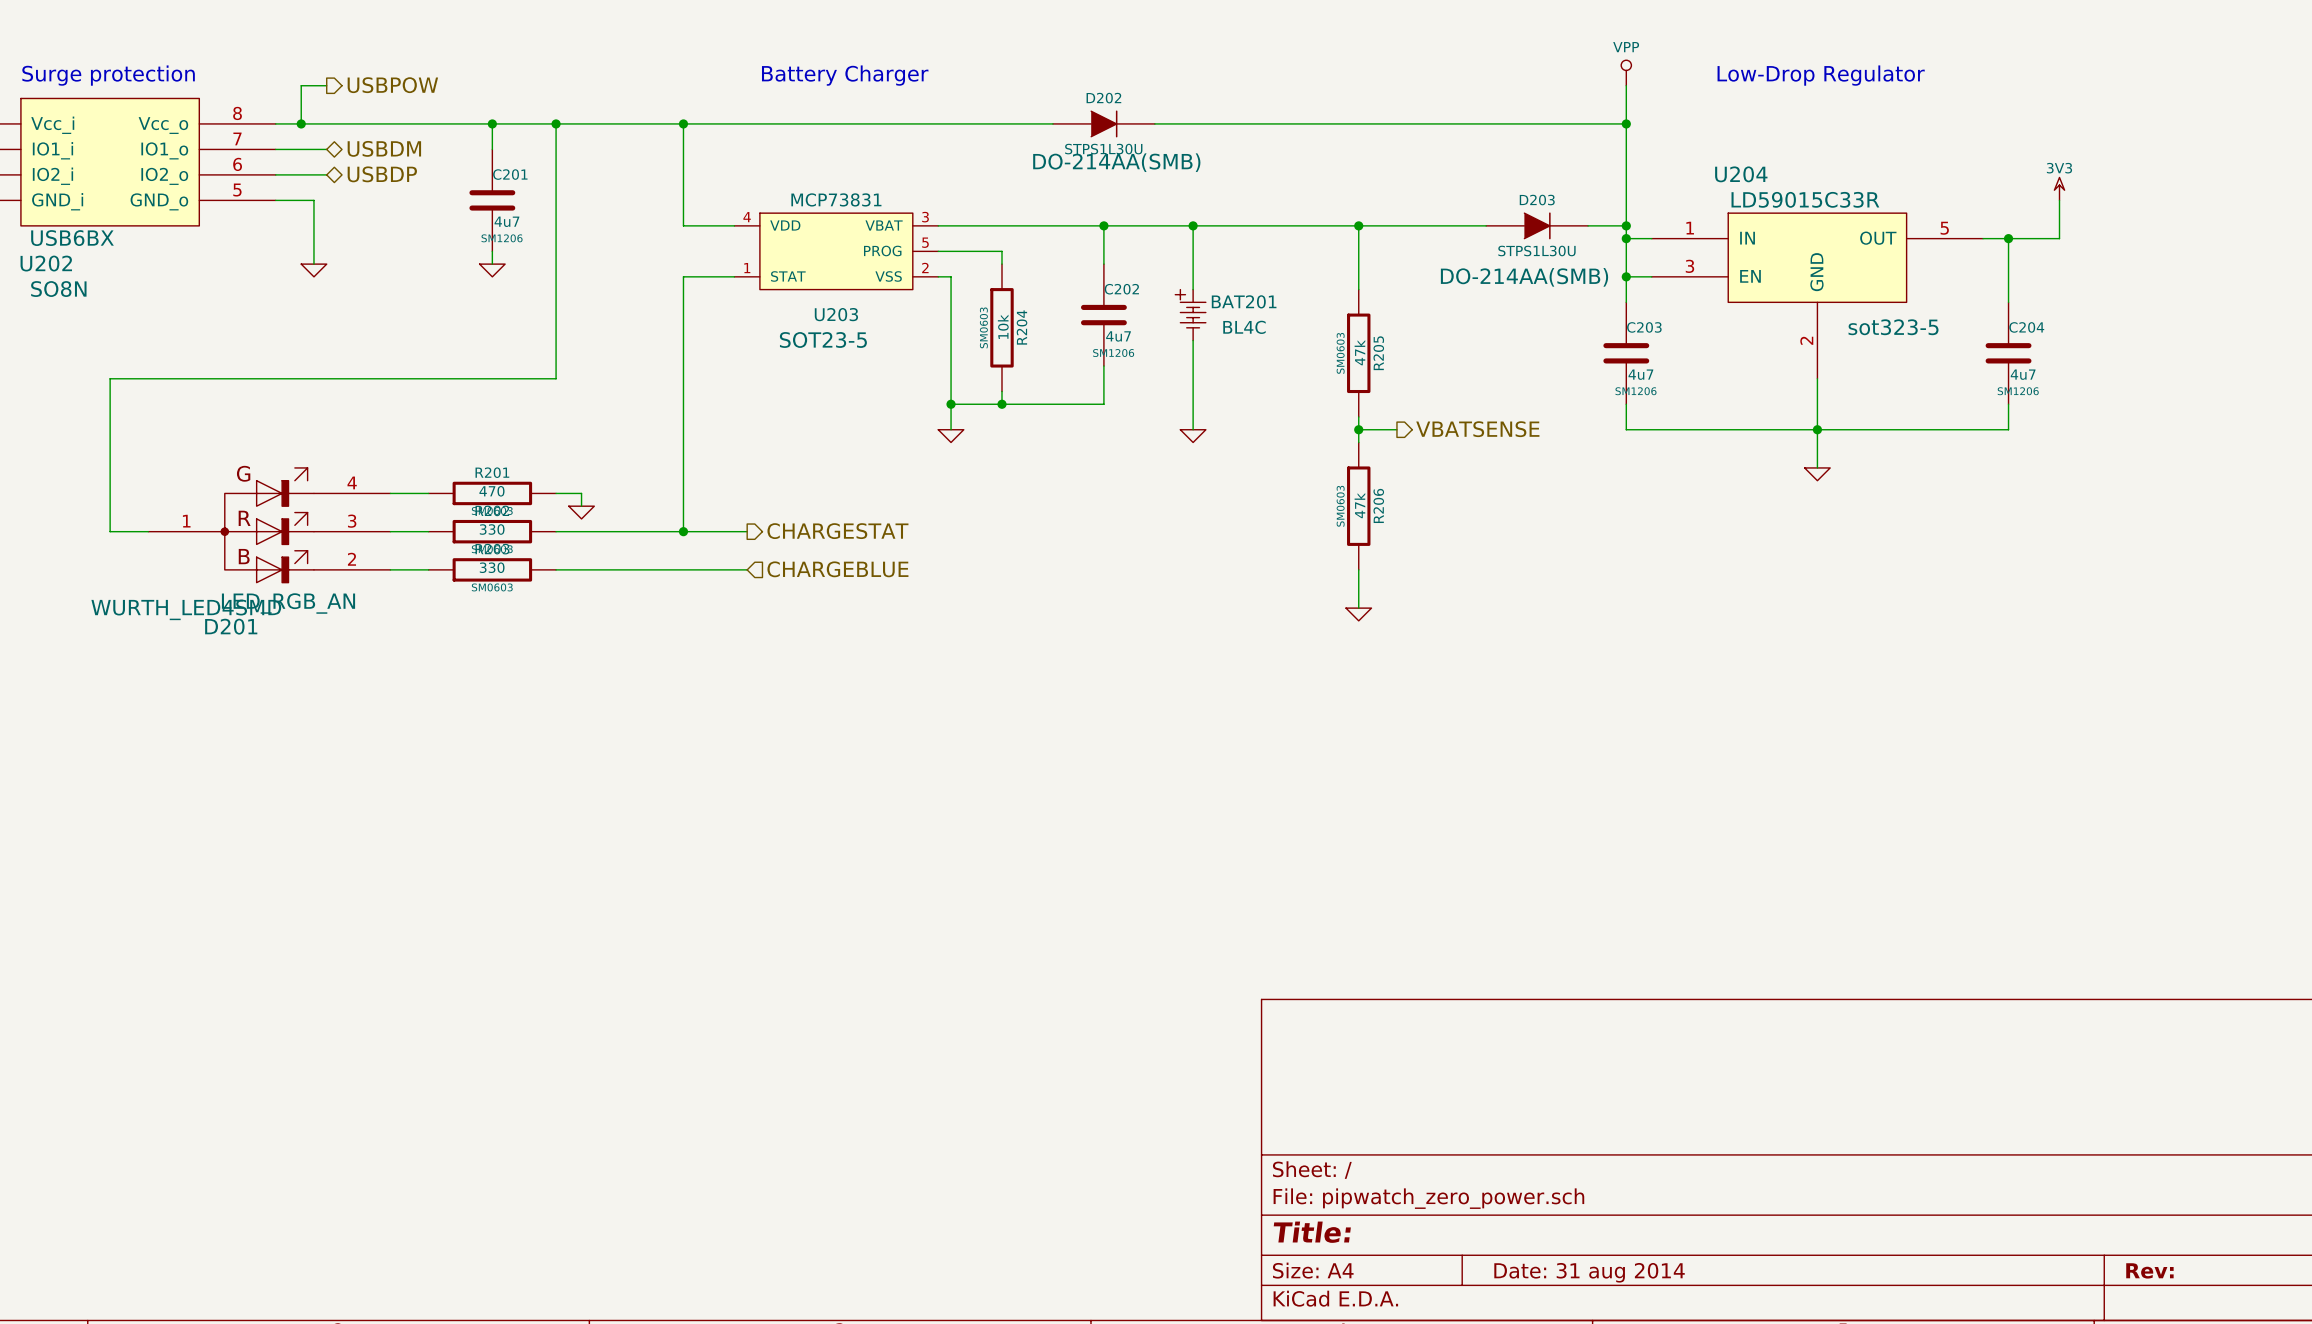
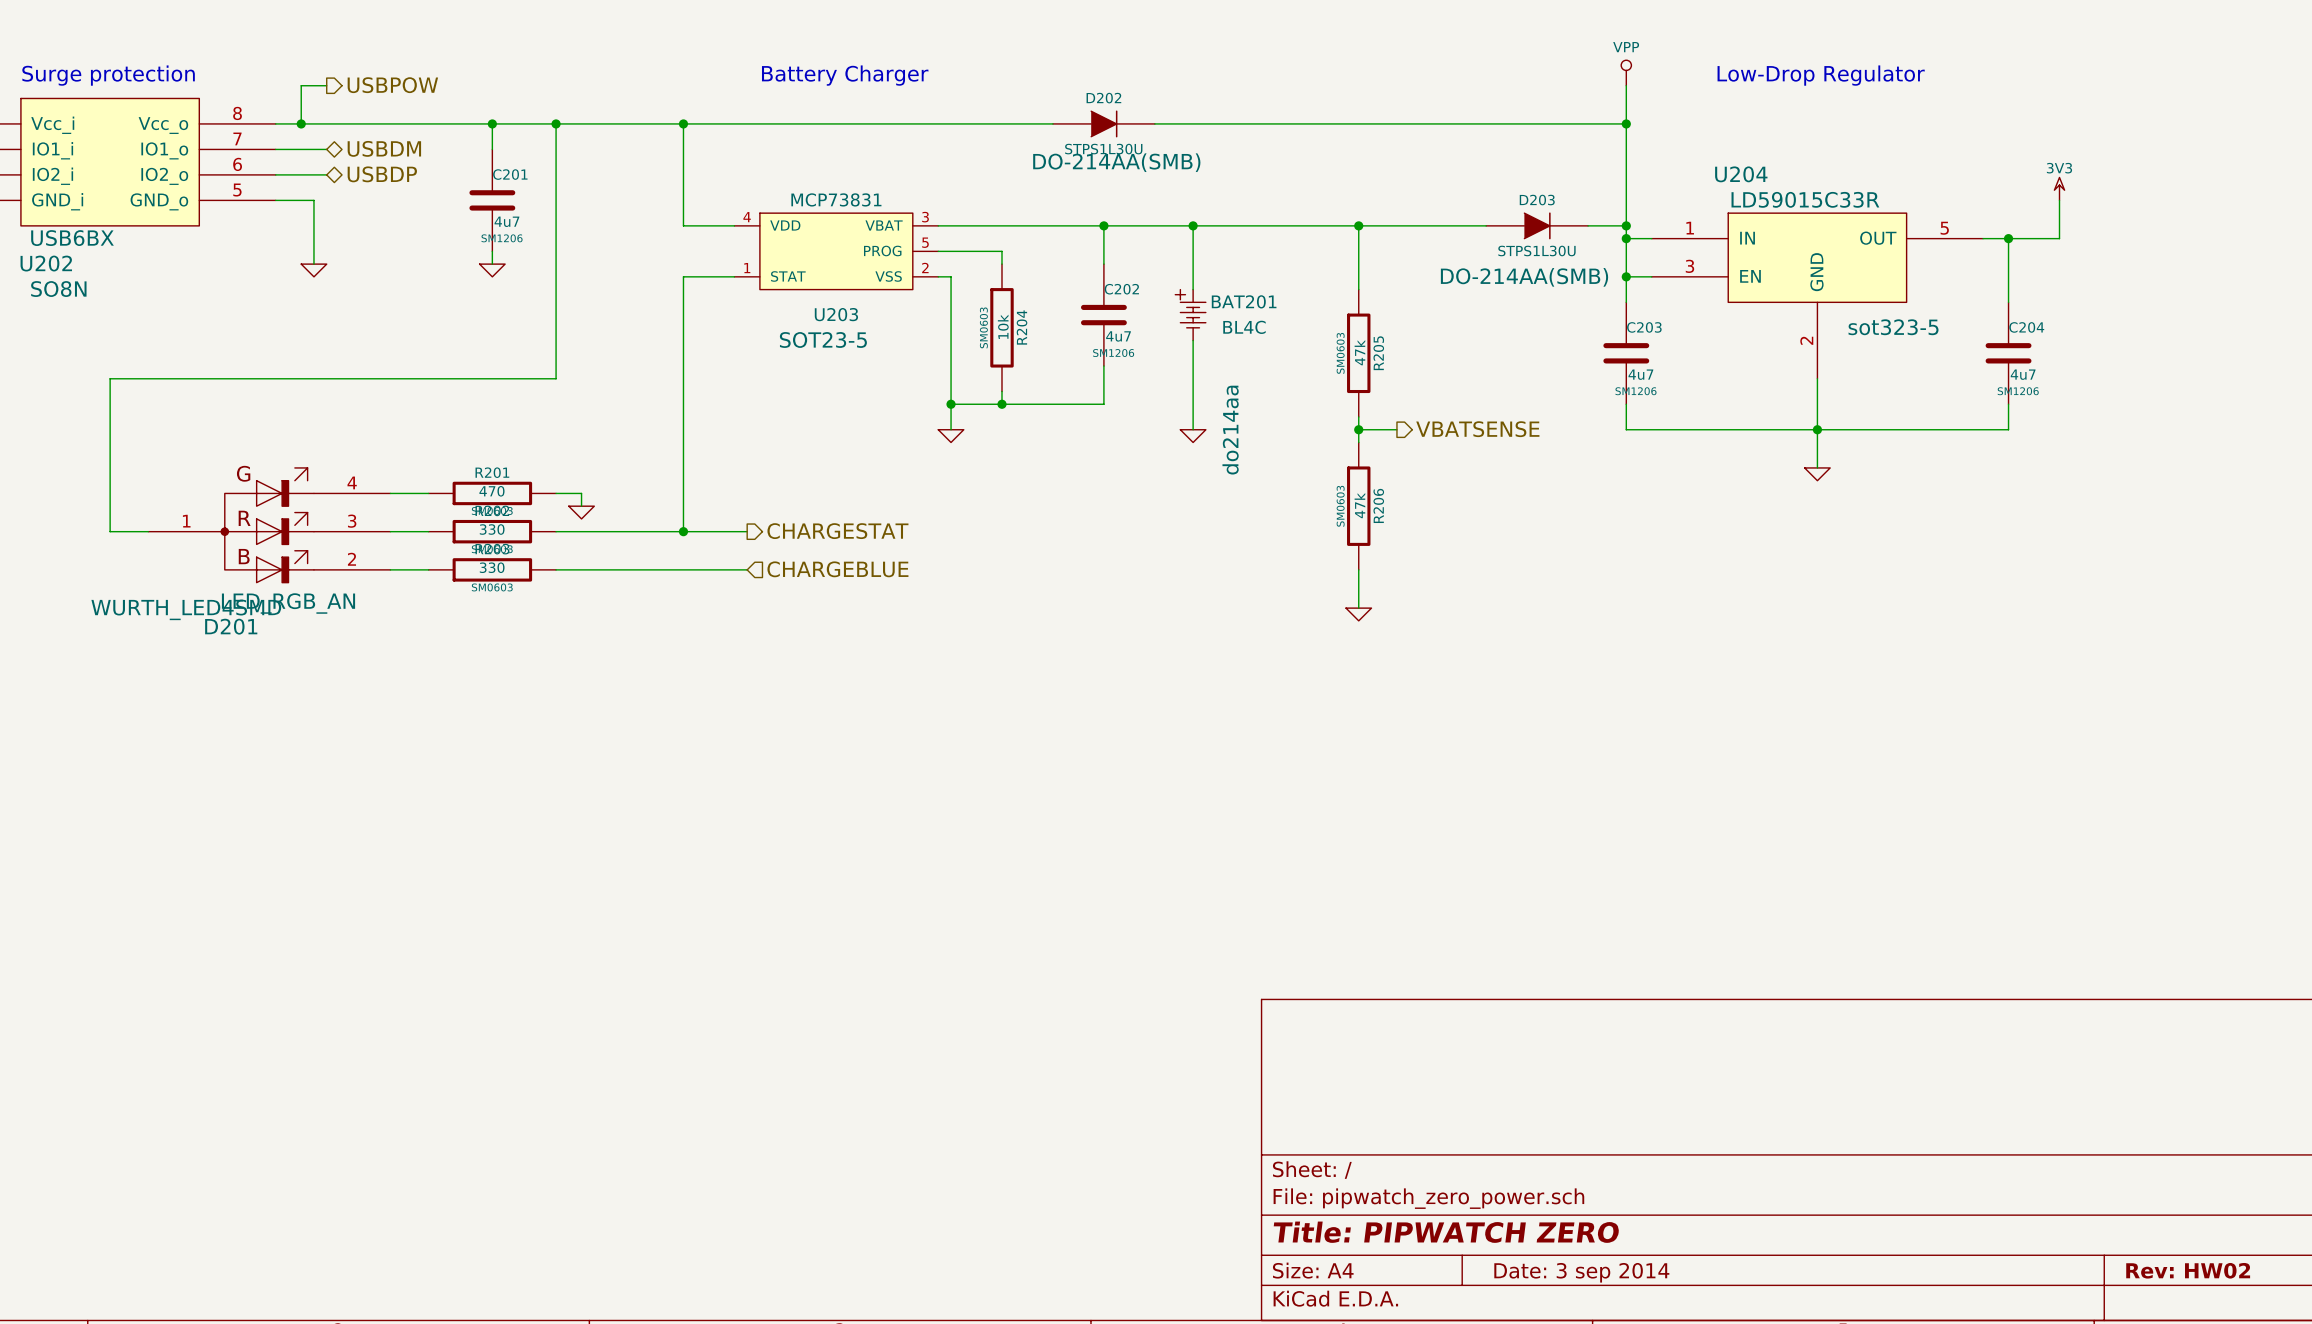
BAT201 text: none -> do214aa (1230, 430)
title block: Title: (1312, 1232) -> Title: PIPWATCH ZERO (1446, 1232)
title block: Rev: (2149, 1270) -> Rev: HW02 (2188, 1270)
title block: Date: 31 aug 2014 (1589, 1272) -> Date: 3 sep 2014 (1581, 1272)

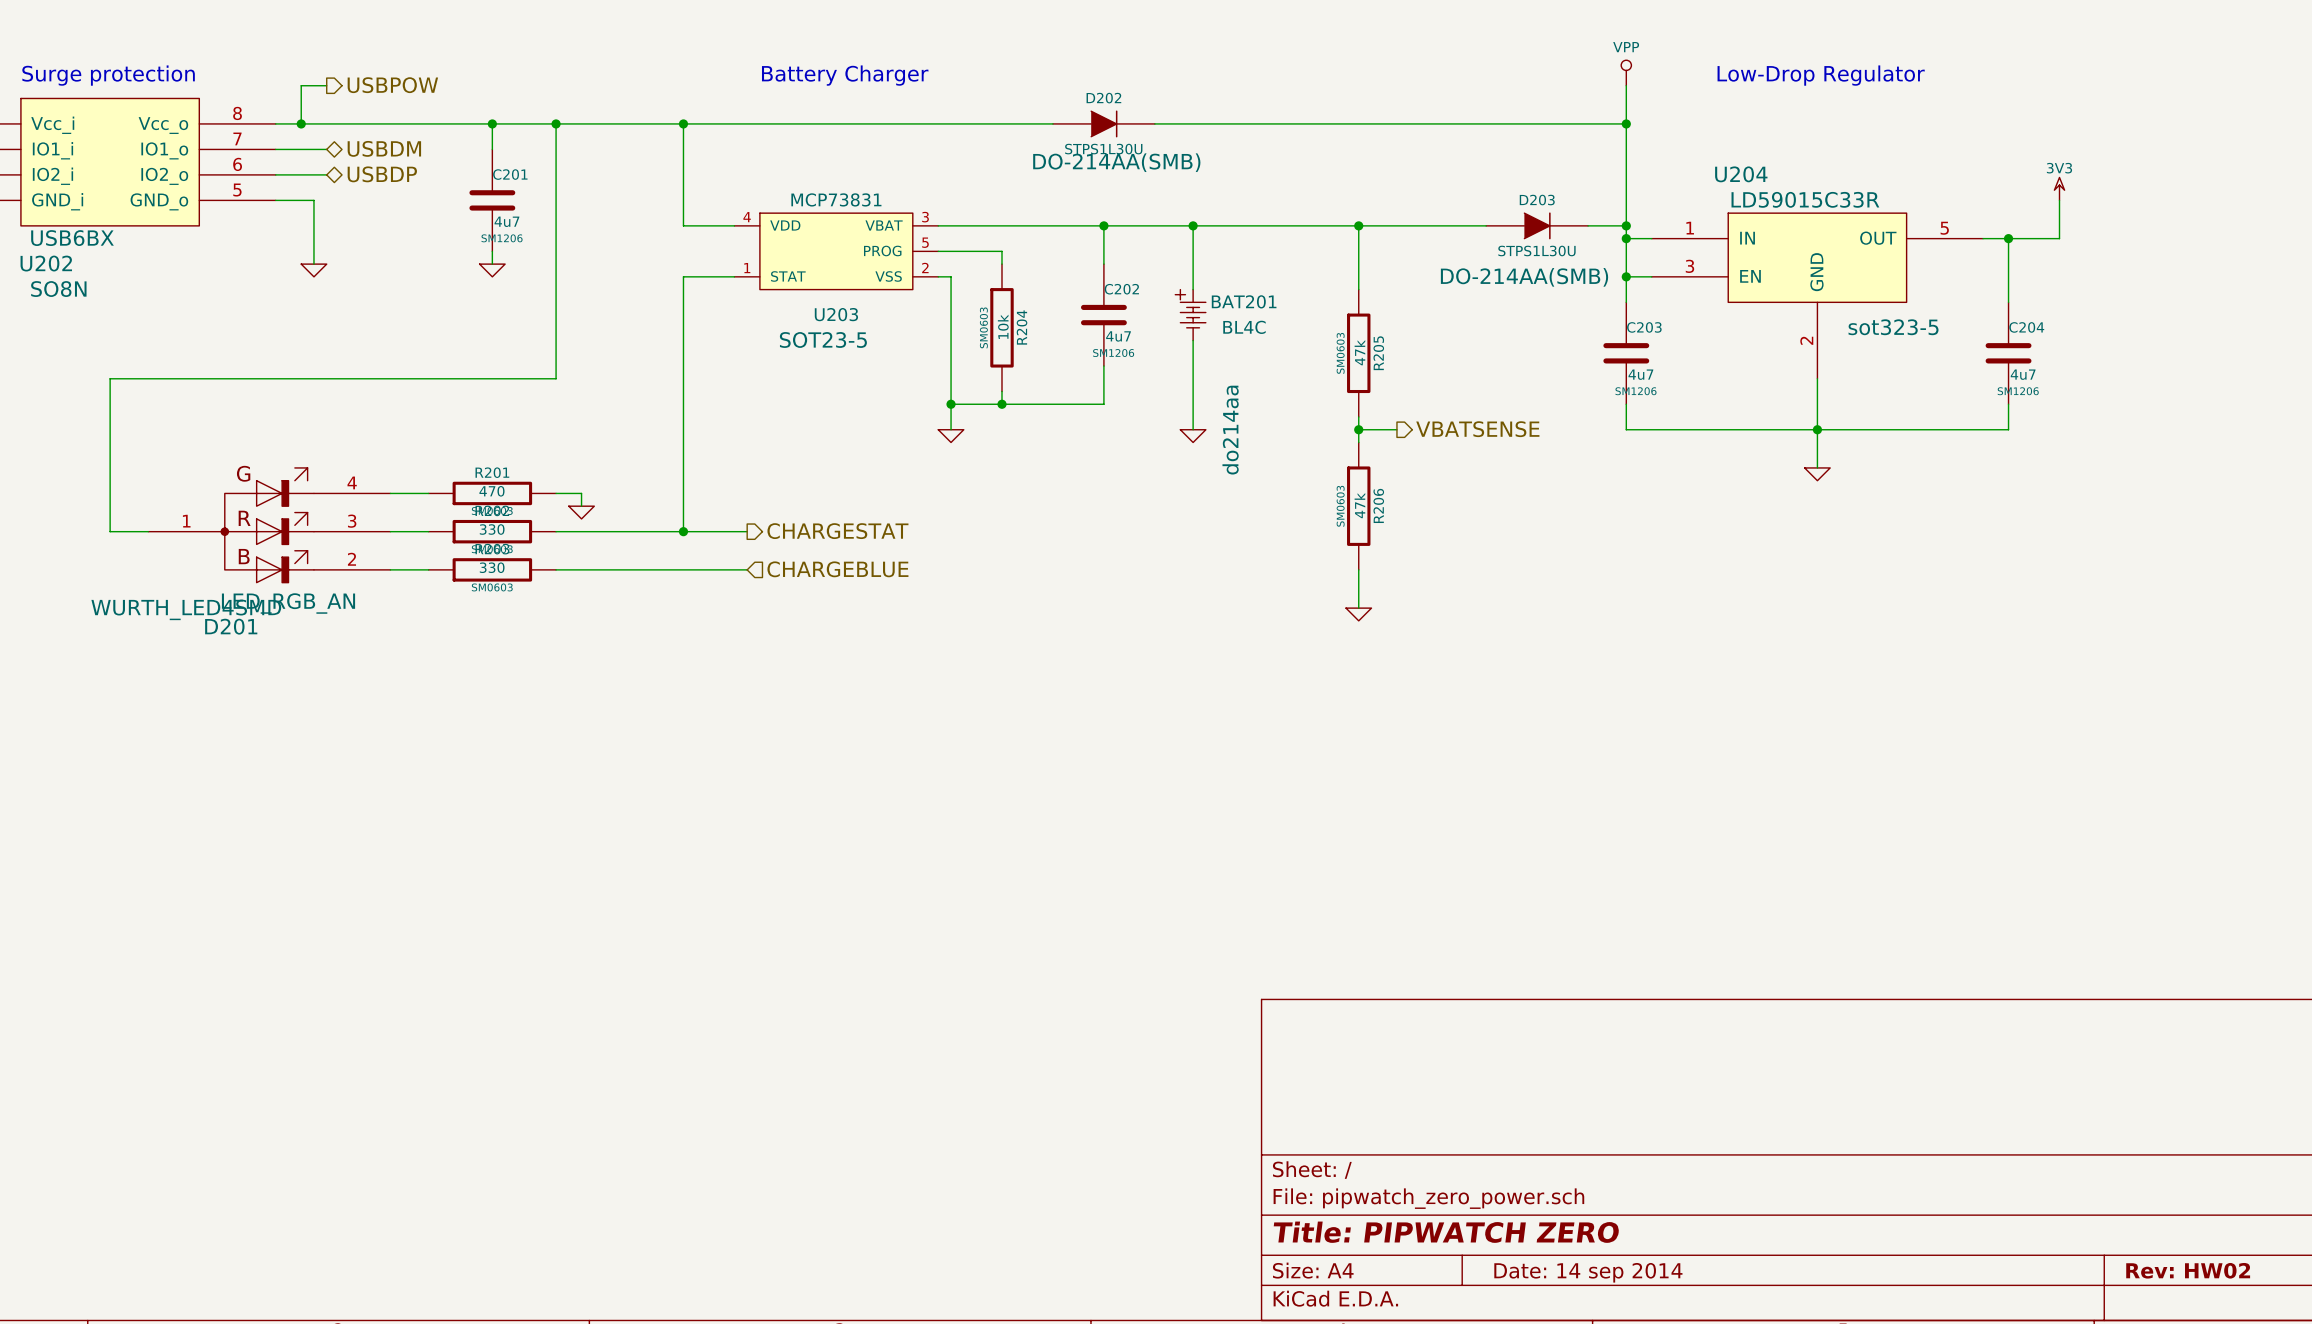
title block: Date: 3 sep 2014 (1581, 1272) -> Date: 14 sep 2014 (1588, 1272)

